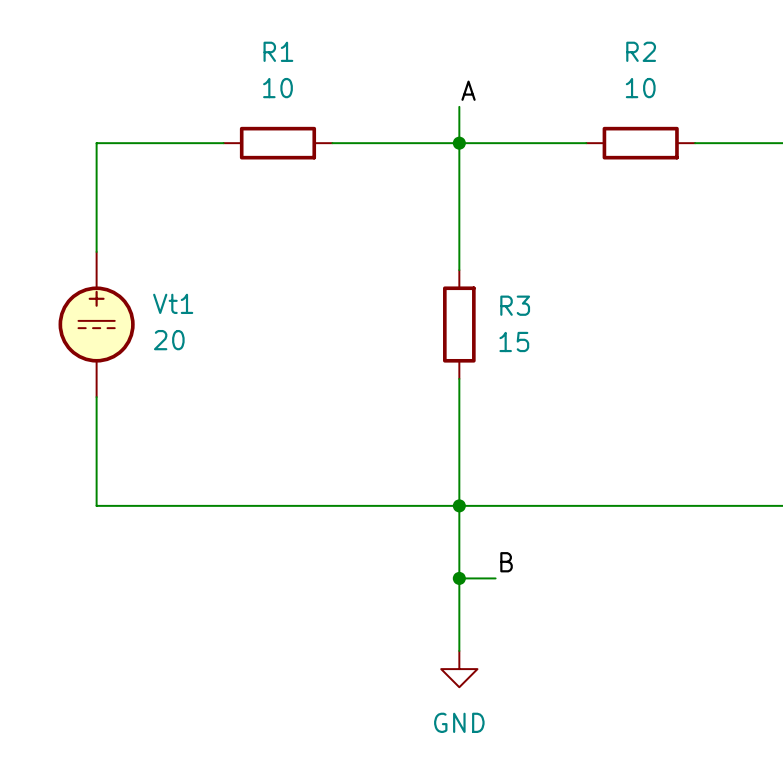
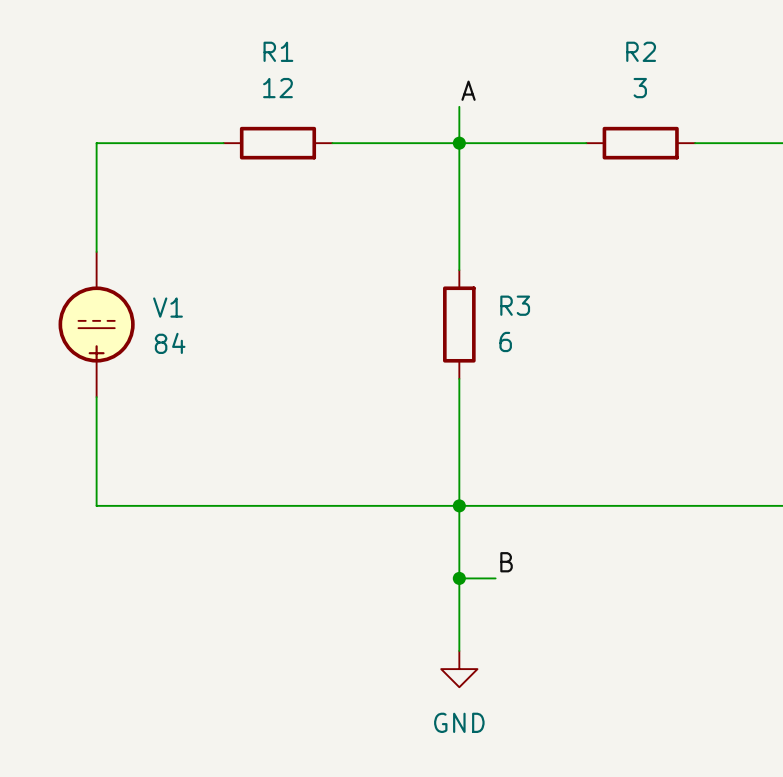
R1 value: 10 (277, 88) -> 12 (277, 88)
R2 value: 10 (640, 88) -> 3 (640, 88)
Vt1: 20 (96, 324) -> none
V1: none -> 84 (96, 324)
R3 value: 15 (514, 341) -> 6 (505, 341)

